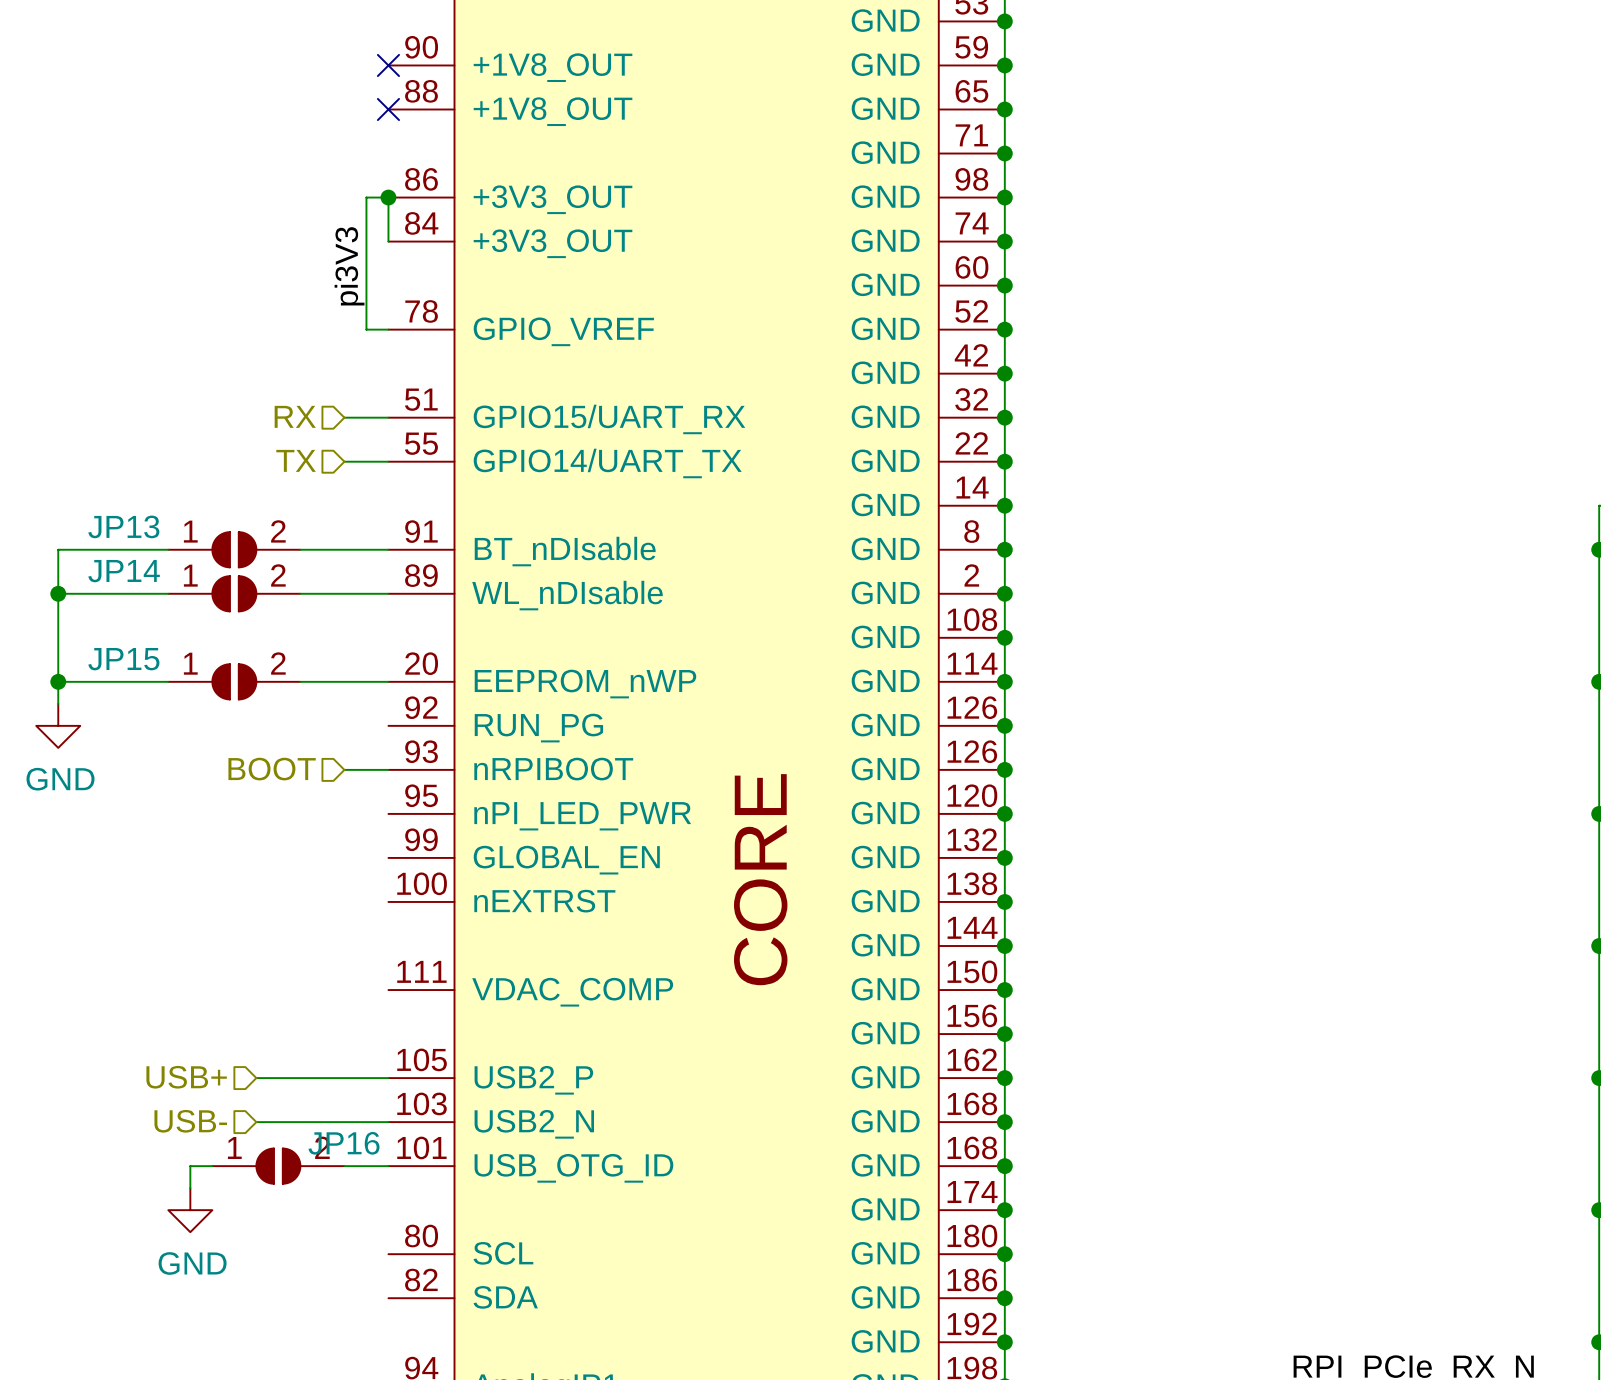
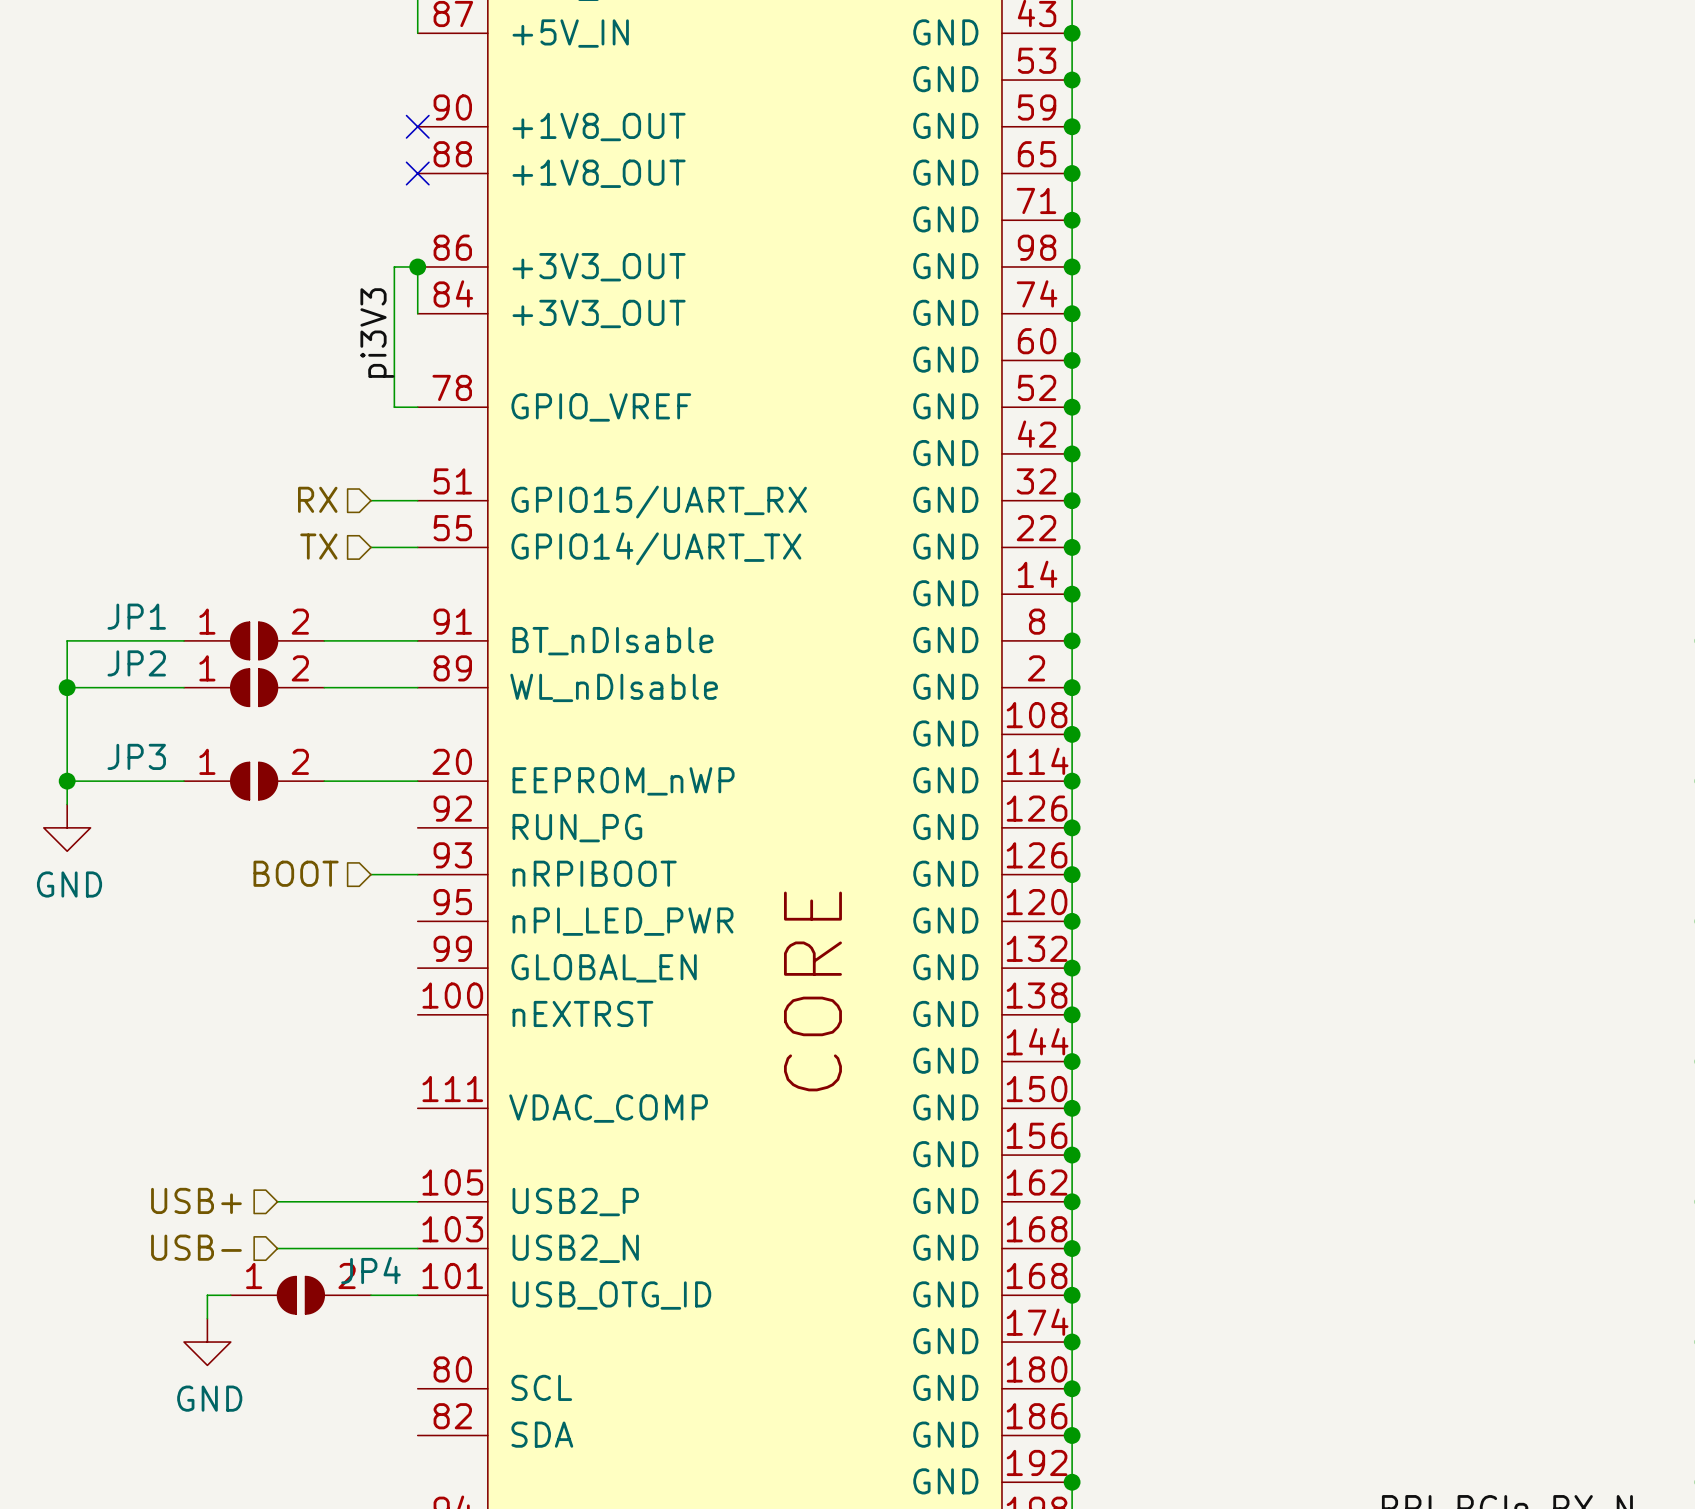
JP13 name: JP13 (123, 526) -> JP1 (136, 616)
JP14 name: JP14 (124, 571) -> JP2 (136, 663)
JP15 name: JP15 (123, 659) -> JP3 (136, 756)
JP16 name: JP16 (343, 1143) -> JP4 (370, 1270)

